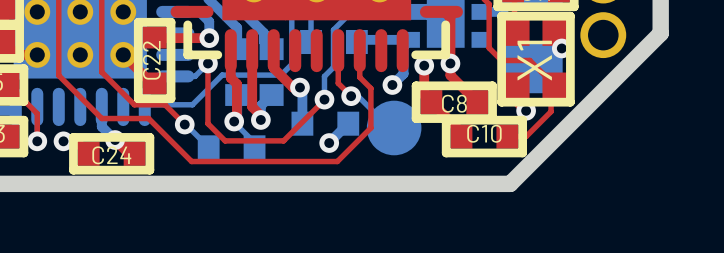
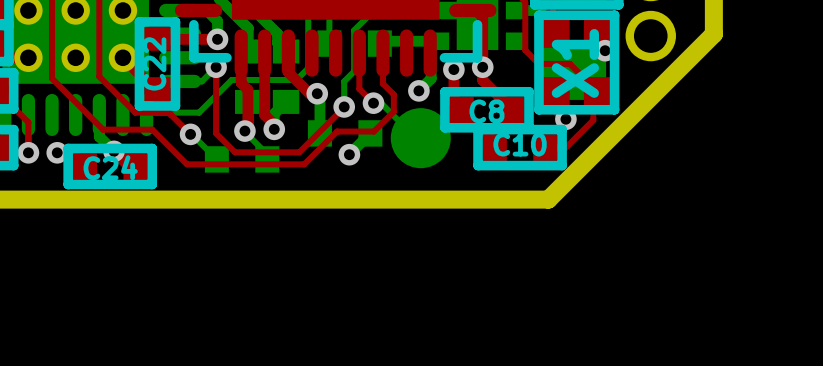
top track: (58, 73) (101, 118) (148, 118) (191, 161) (337, 161) (370, 127) (370, 88) (359, 77) -> (52, 78) (103, 129) (152, 129) (186, 164) (304, 164) (337, 131) (373, 131) (393, 111) (393, 94) (383, 82)

